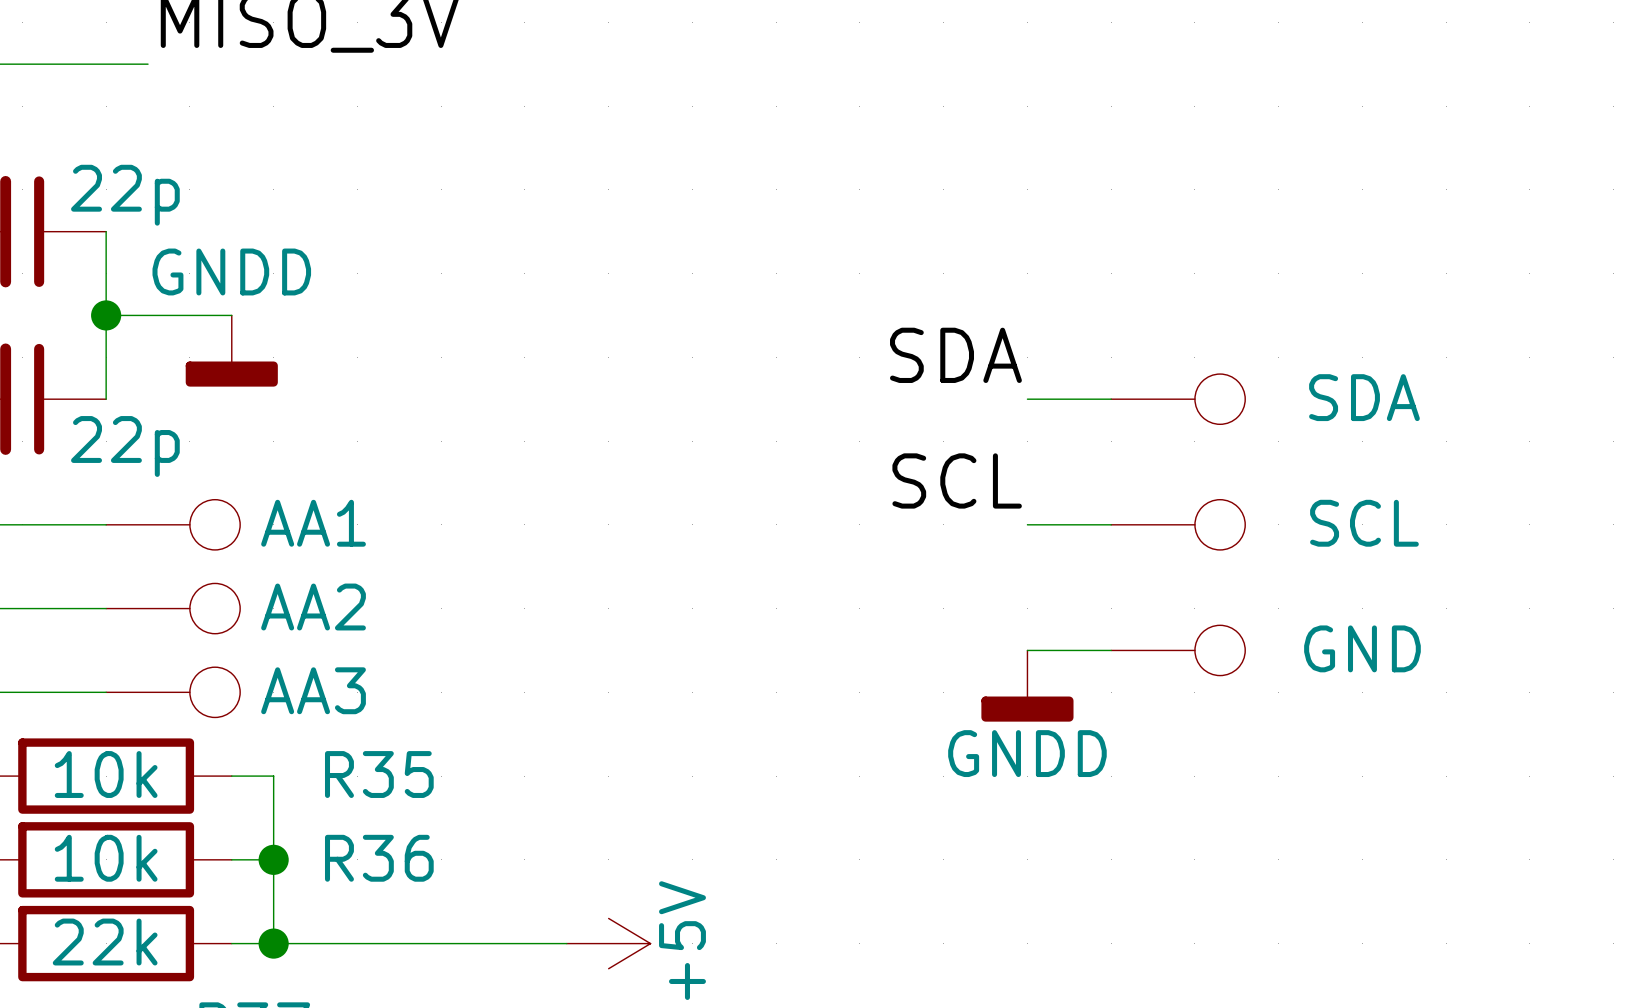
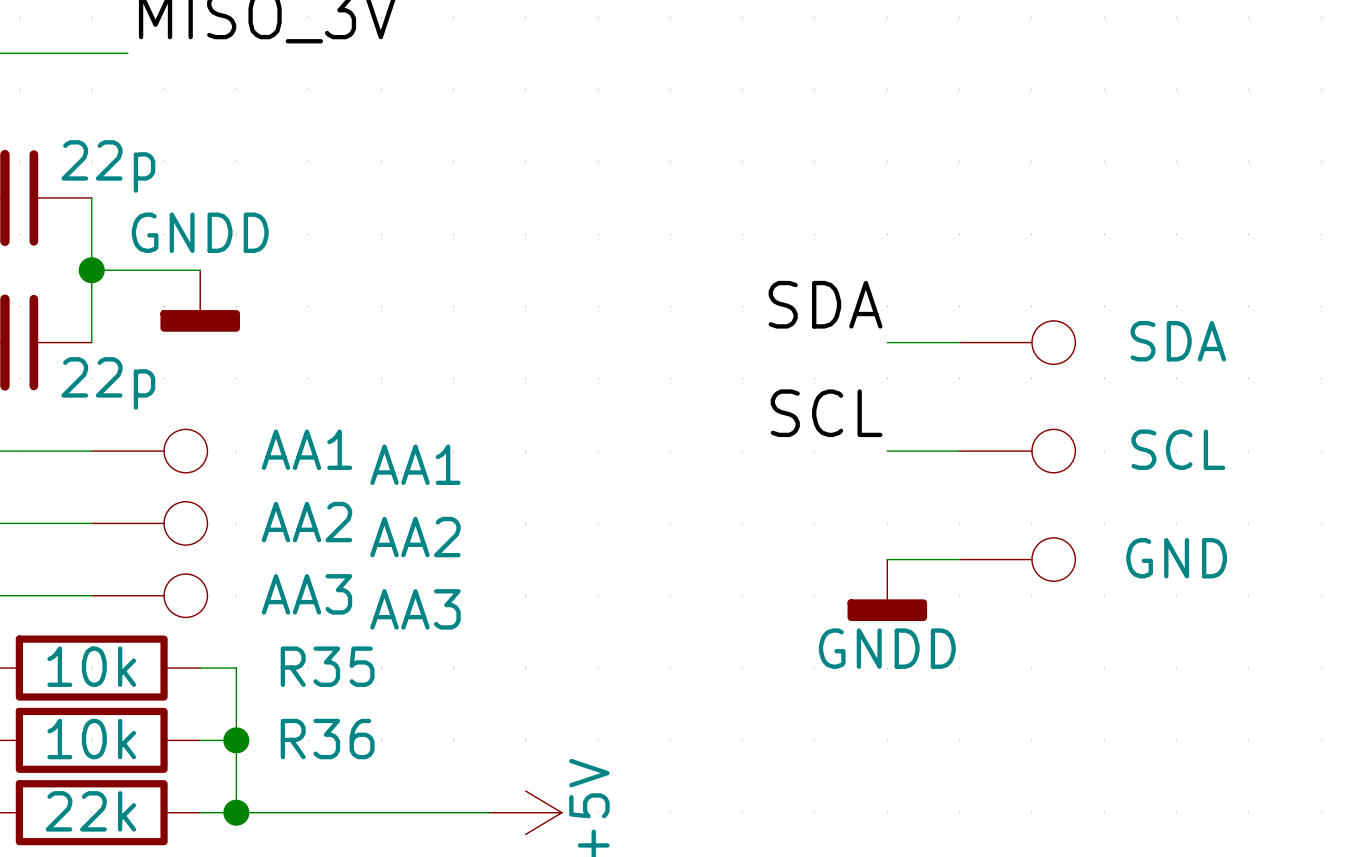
AA1 value position: AA1 (313, 523) -> AA1 (306, 449)
AA1 name: none -> AA1 (415, 464)
AA2 value position: AA2 (313, 607) -> AA2 (306, 522)
AA2 name: none -> AA2 (415, 537)
AA3 value position: AA3 (313, 690) -> AA3 (306, 594)
AA3 name: none -> AA3 (415, 609)

